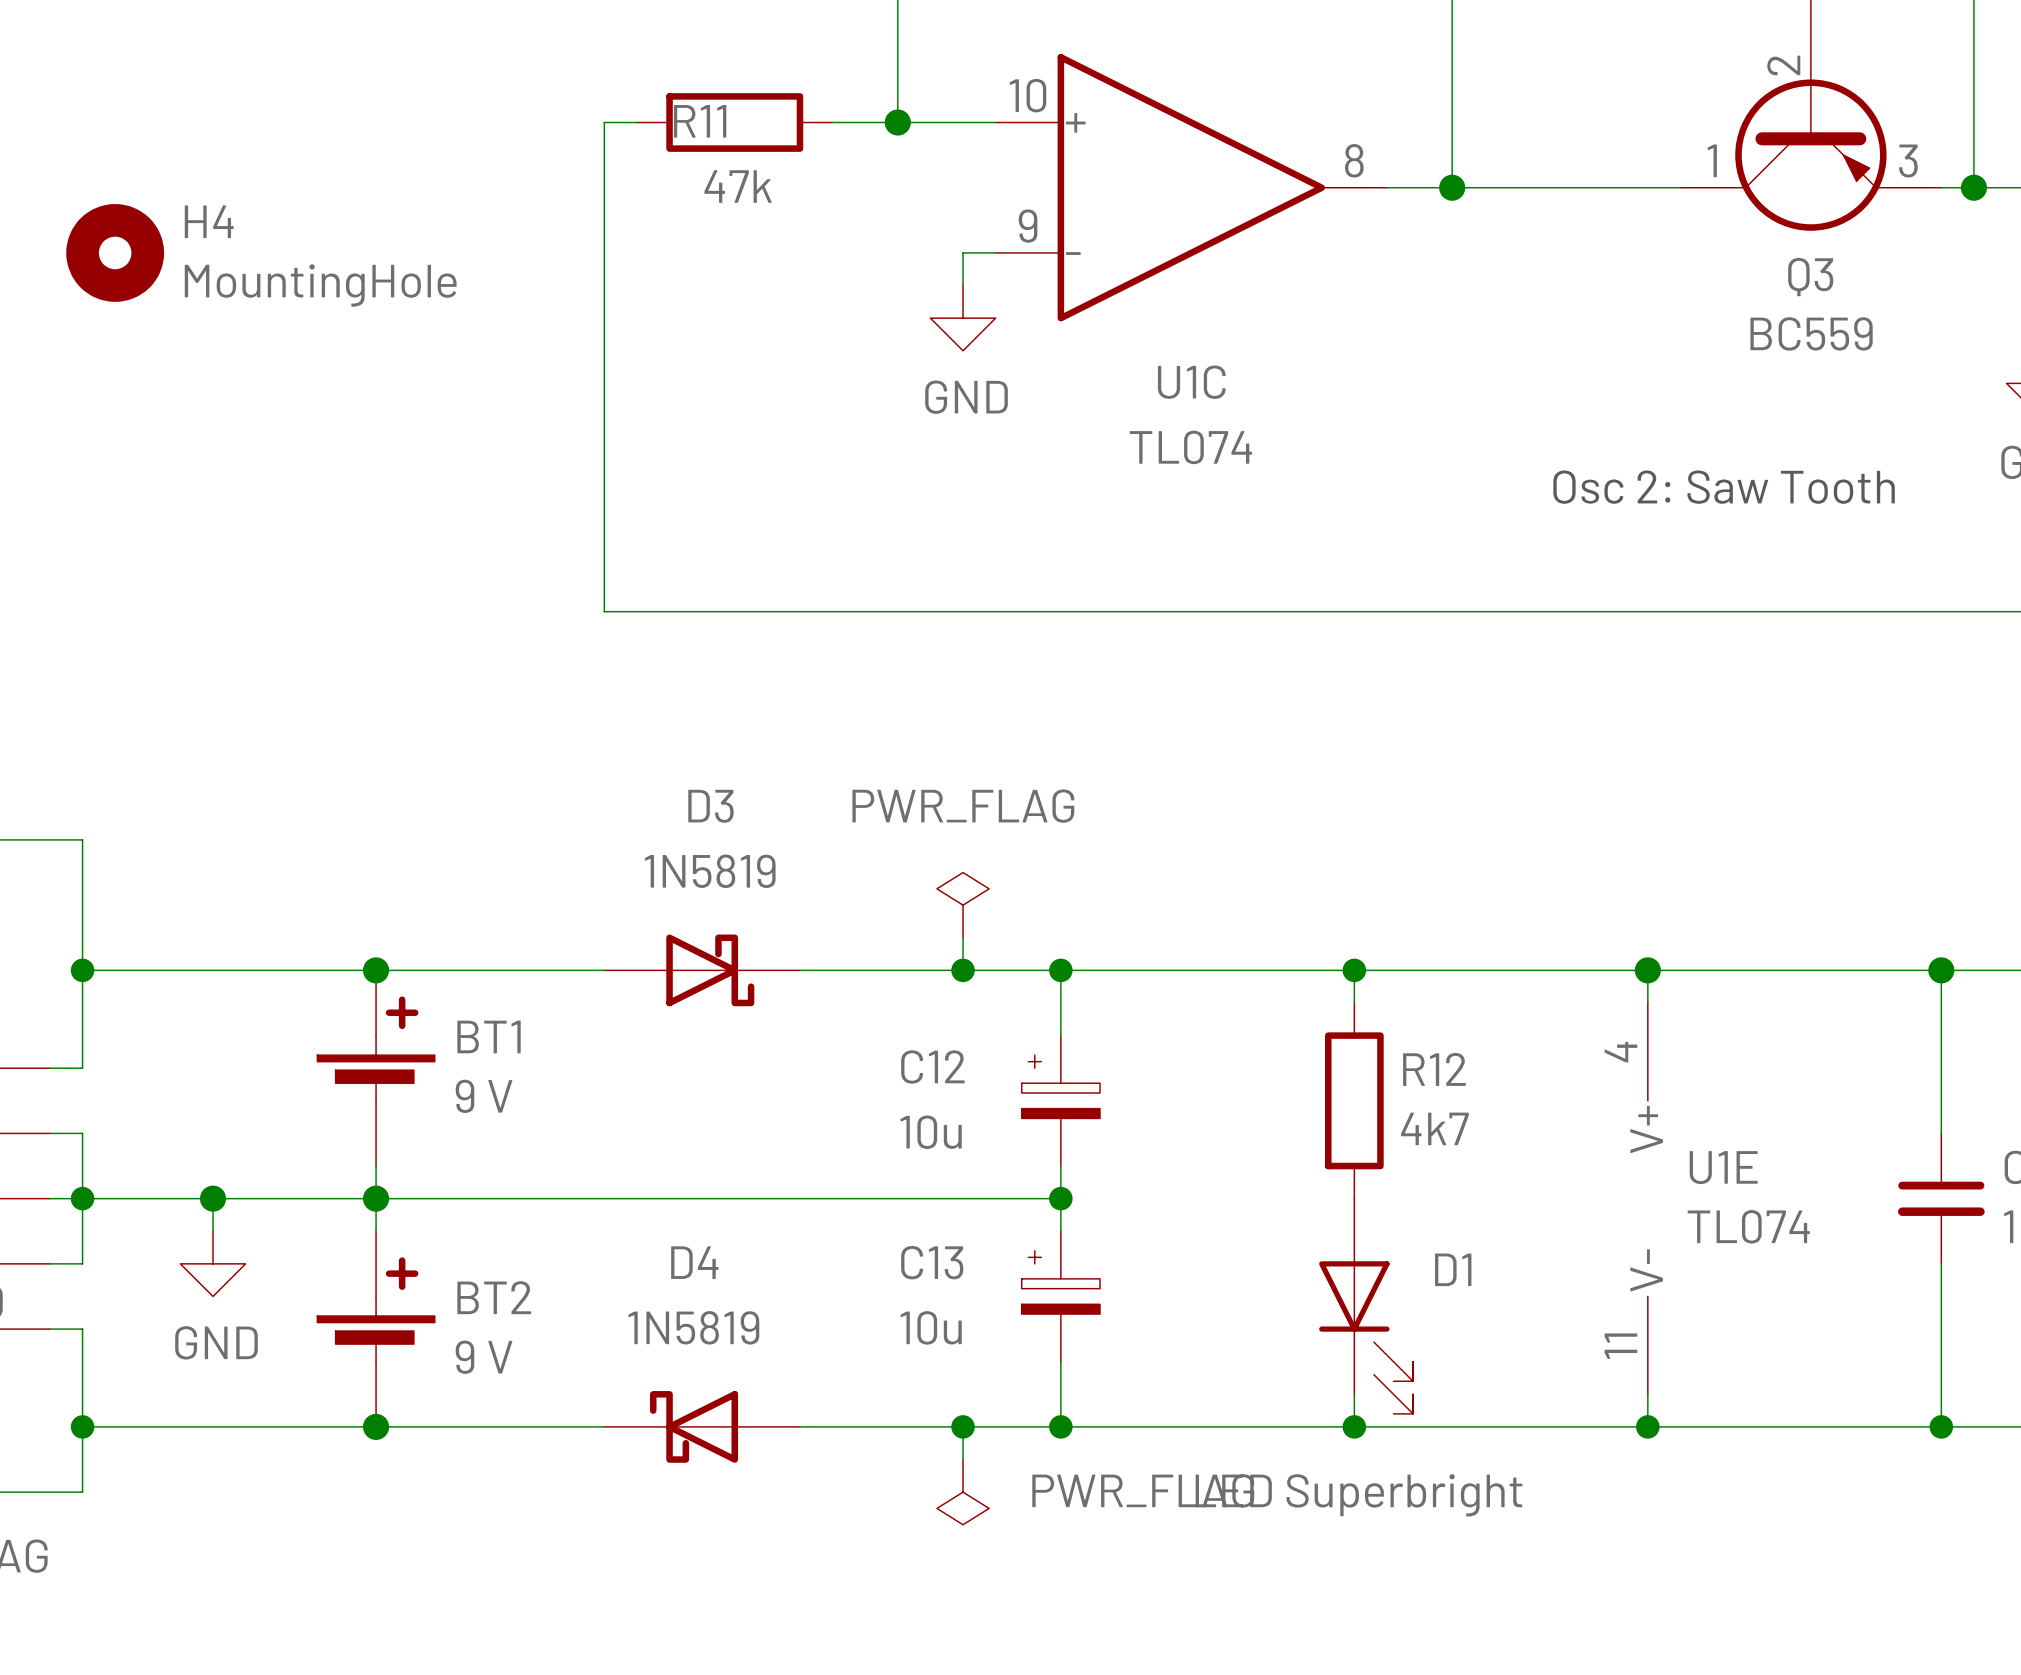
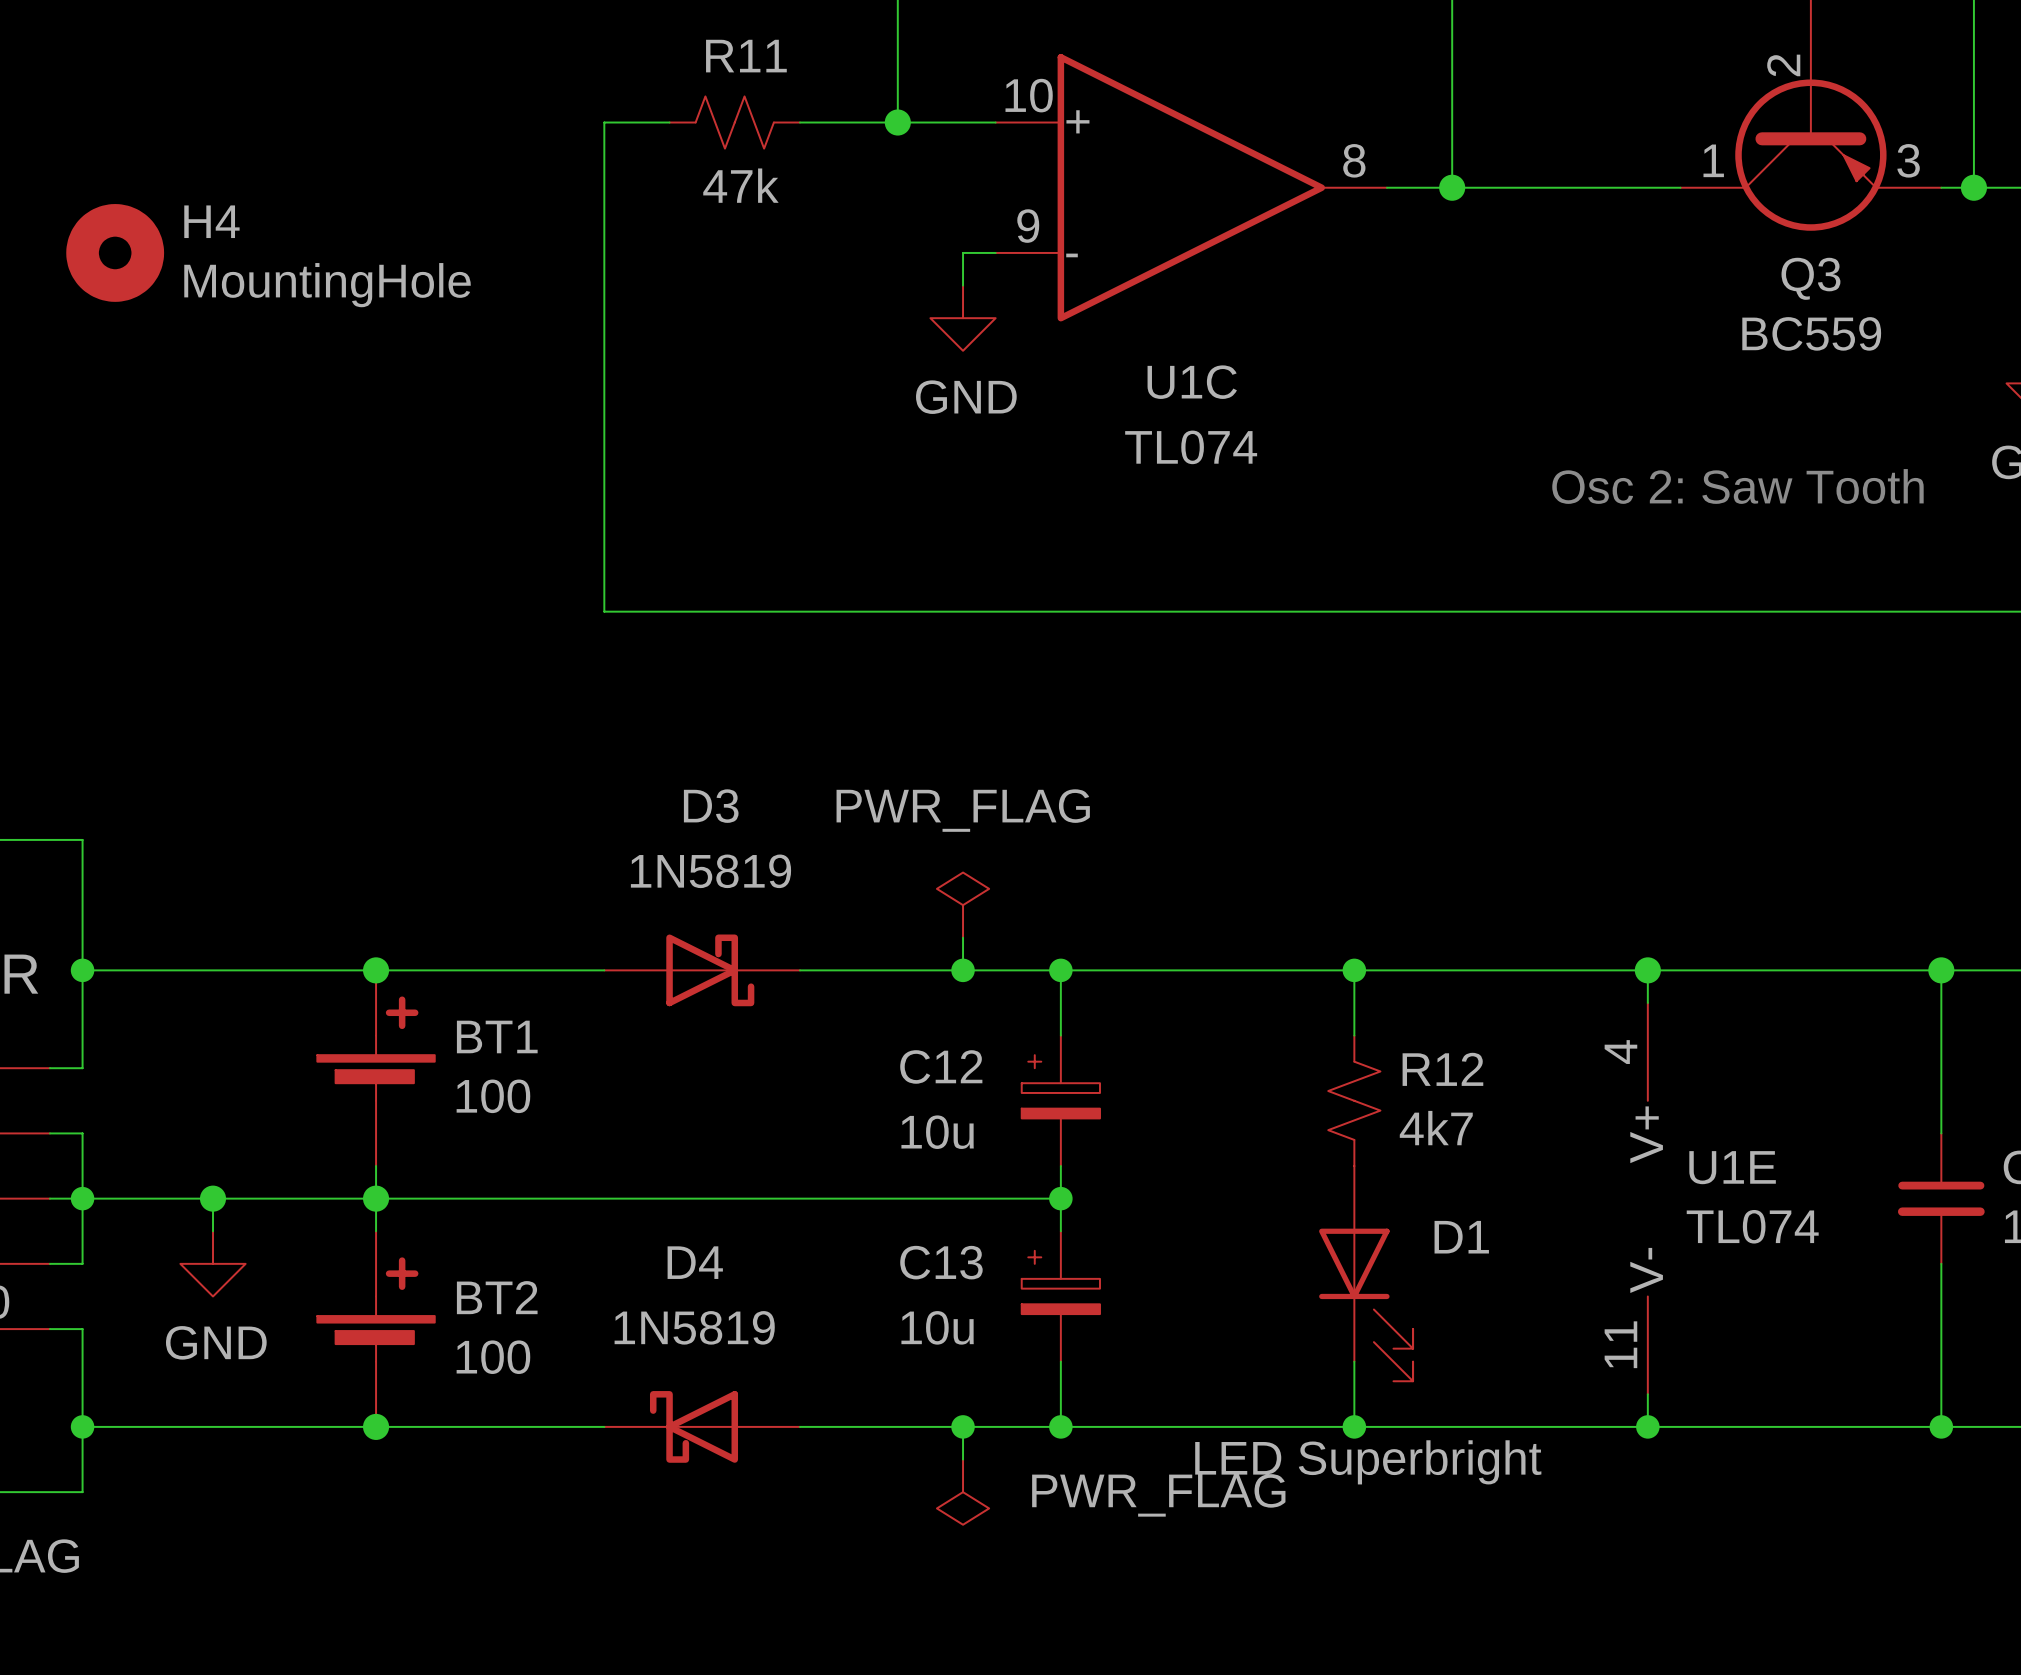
R11 symbol: [636, 93, 833, 152] -> [669, 96, 800, 149]
R11 name position: R11 (700, 121) -> R11 (746, 56)
R12 symbol: [1325, 1002, 1384, 1199] -> [1328, 1035, 1381, 1167]
BT1 value: 9 V (484, 1096) -> 100 (493, 1096)
D1 position: (1366, 1306) -> (1366, 1273)
BT2 value: 9 V (484, 1357) -> 100 (493, 1357)

